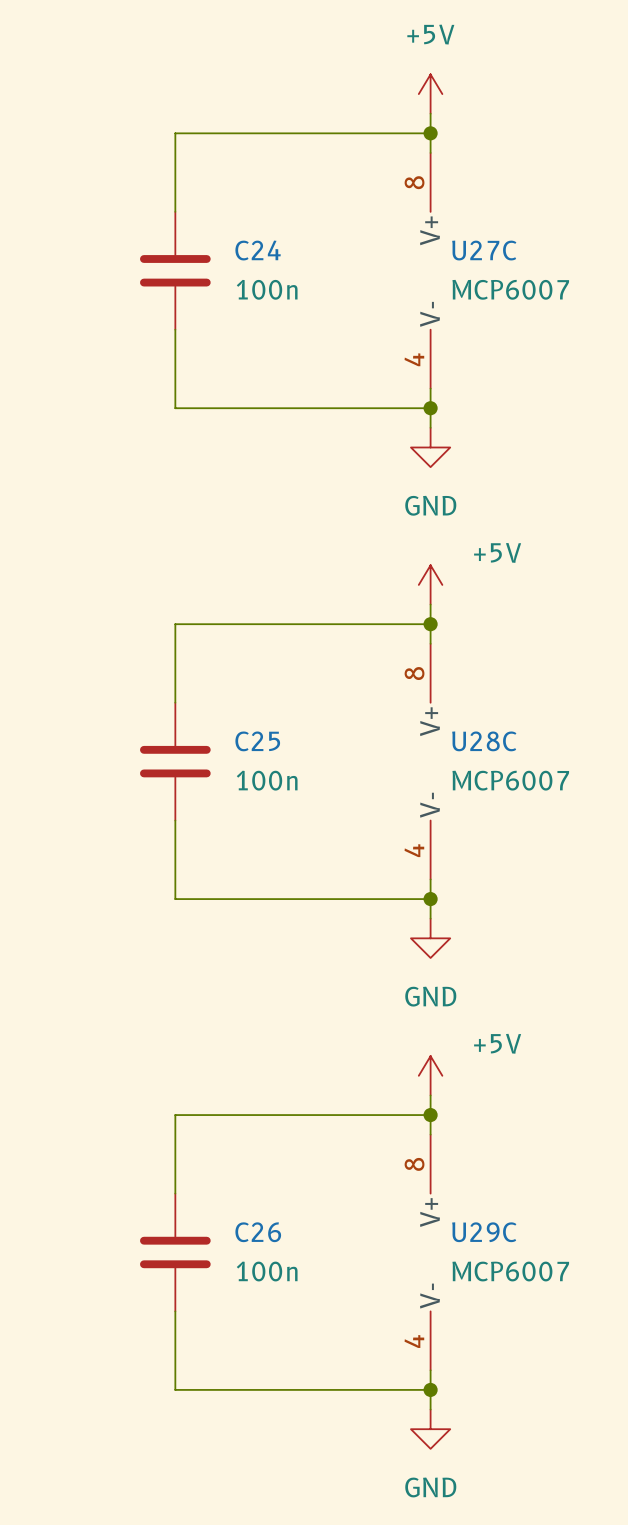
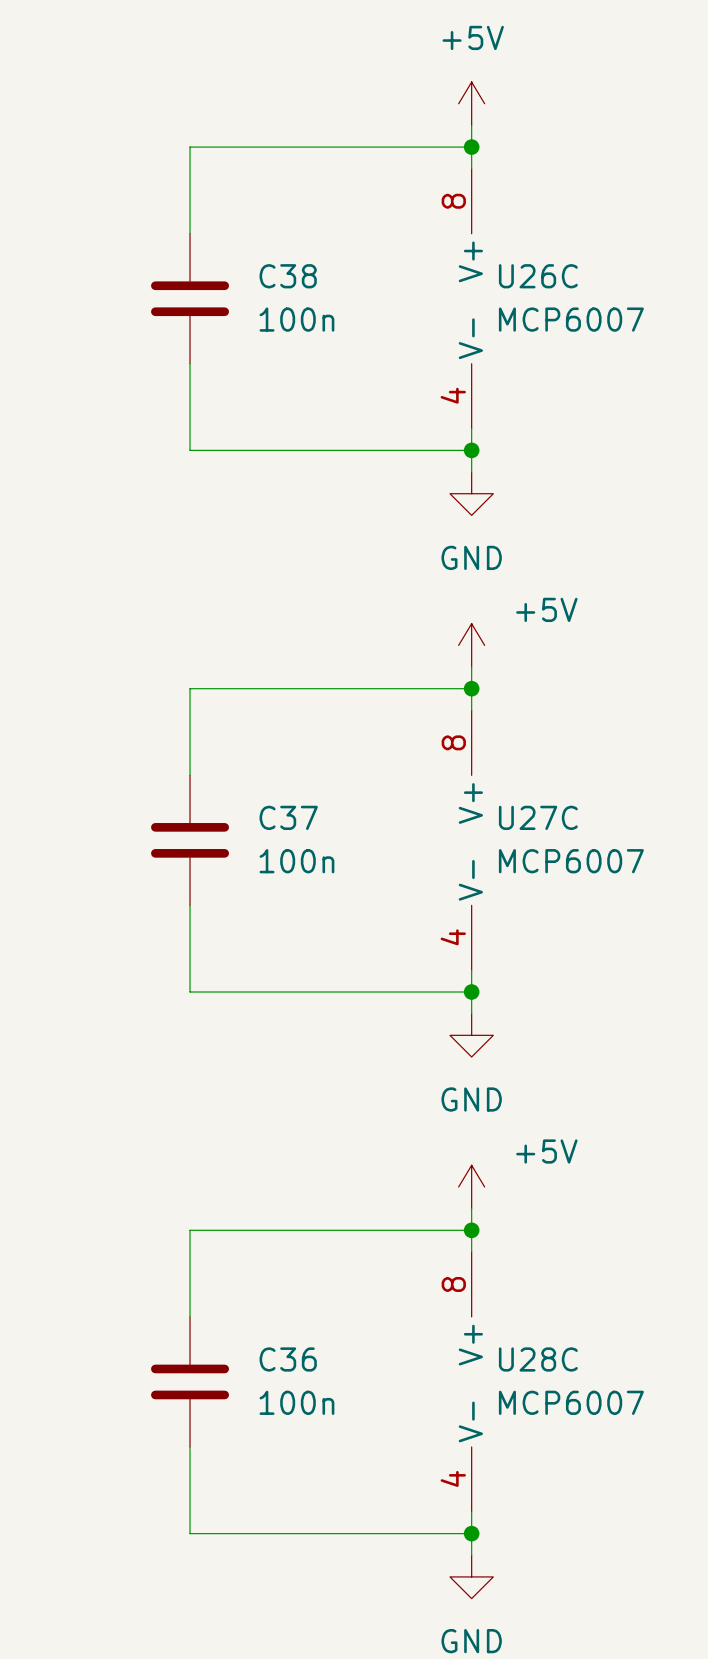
C24 name: C24 (258, 250) -> C38 (288, 276)
U27C name: U27C (484, 250) -> U26C (538, 276)
C25 name: C25 (257, 741) -> C37 (288, 817)
U28C name: U28C (484, 741) -> U27C (538, 817)
C26 name: C26 (258, 1232) -> C36 (288, 1359)
U29C name: U29C (484, 1232) -> U28C (538, 1359)

